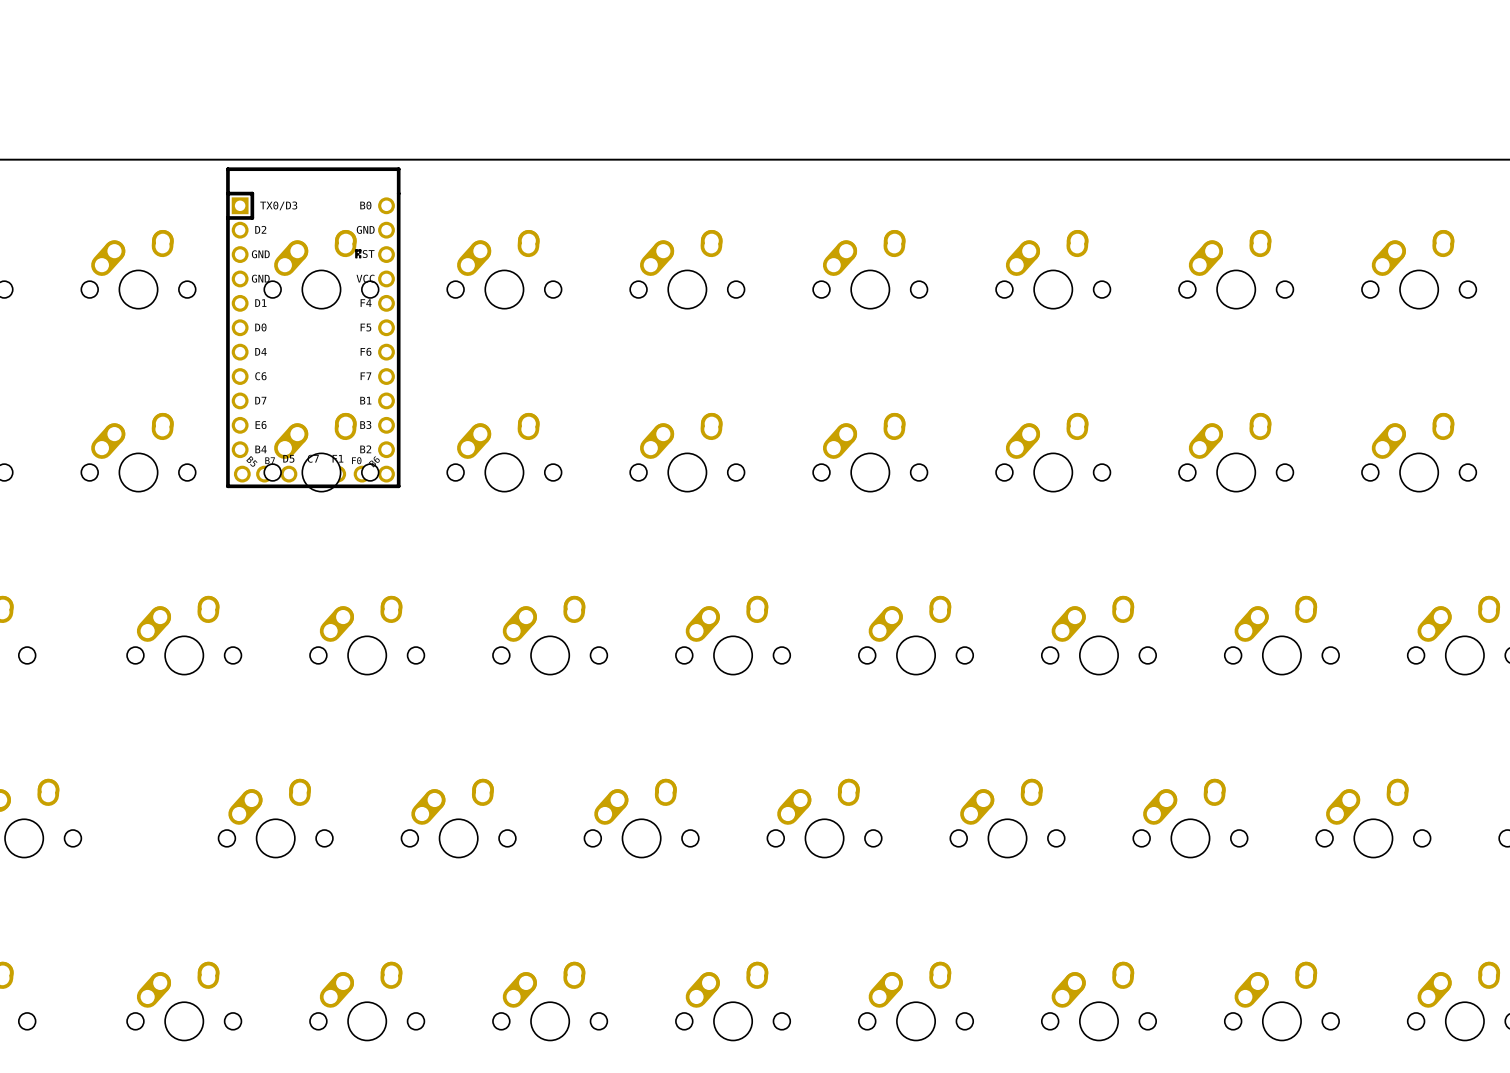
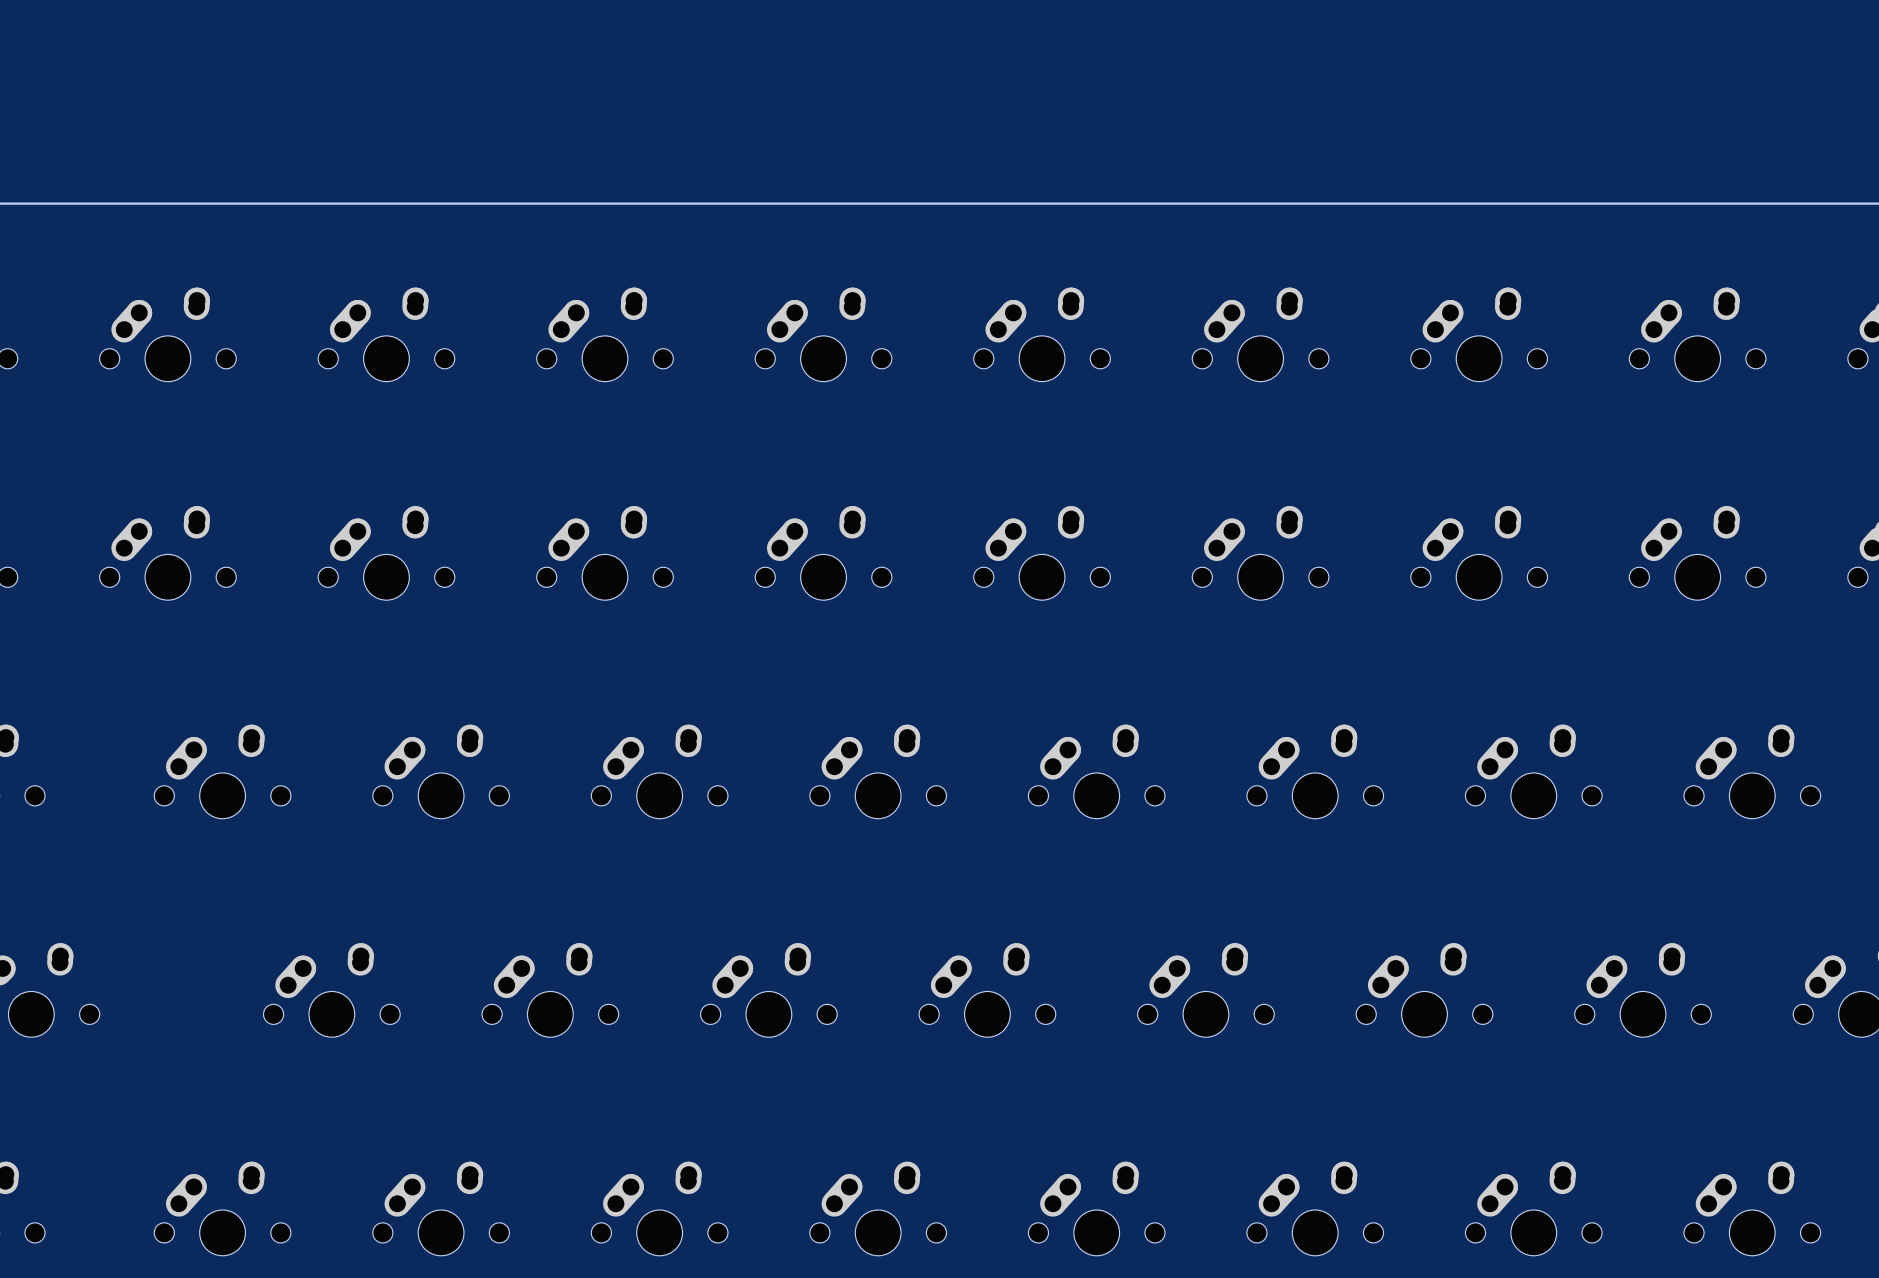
part: (313, 327) -> none

